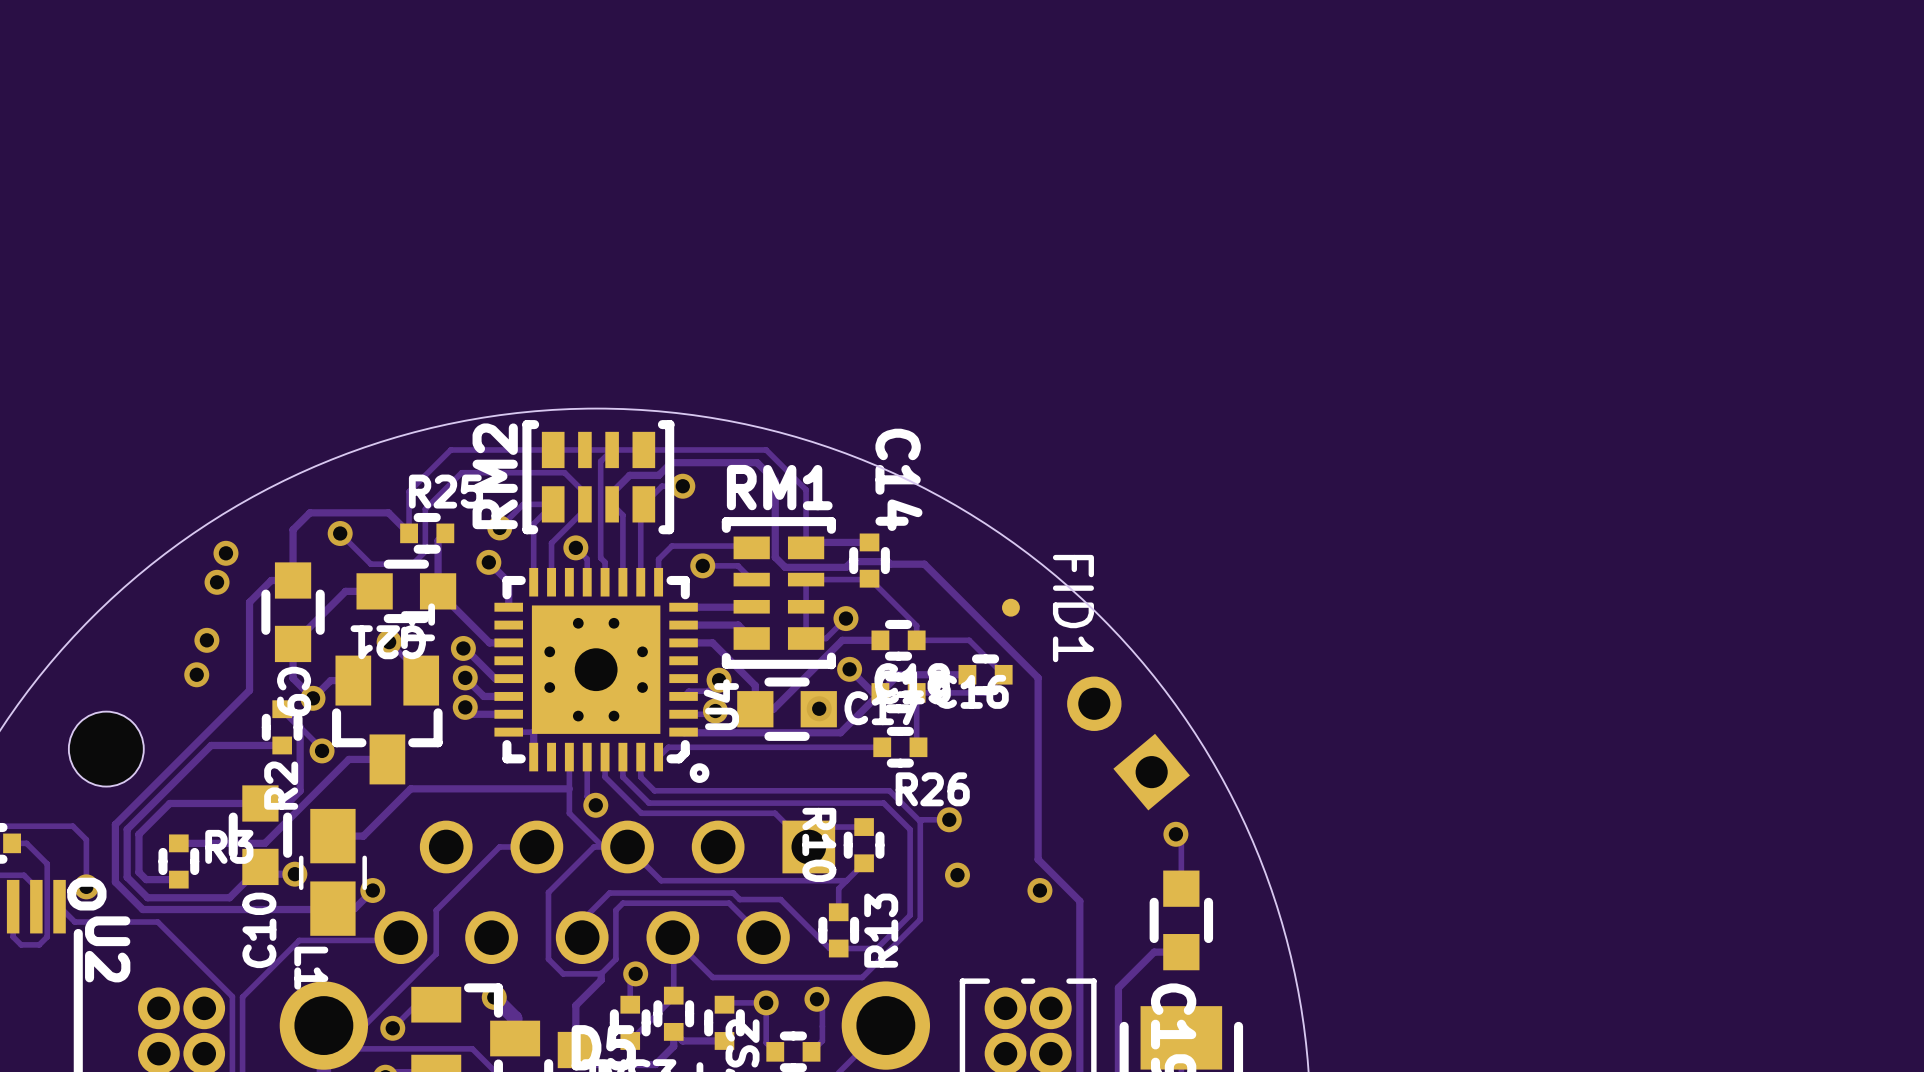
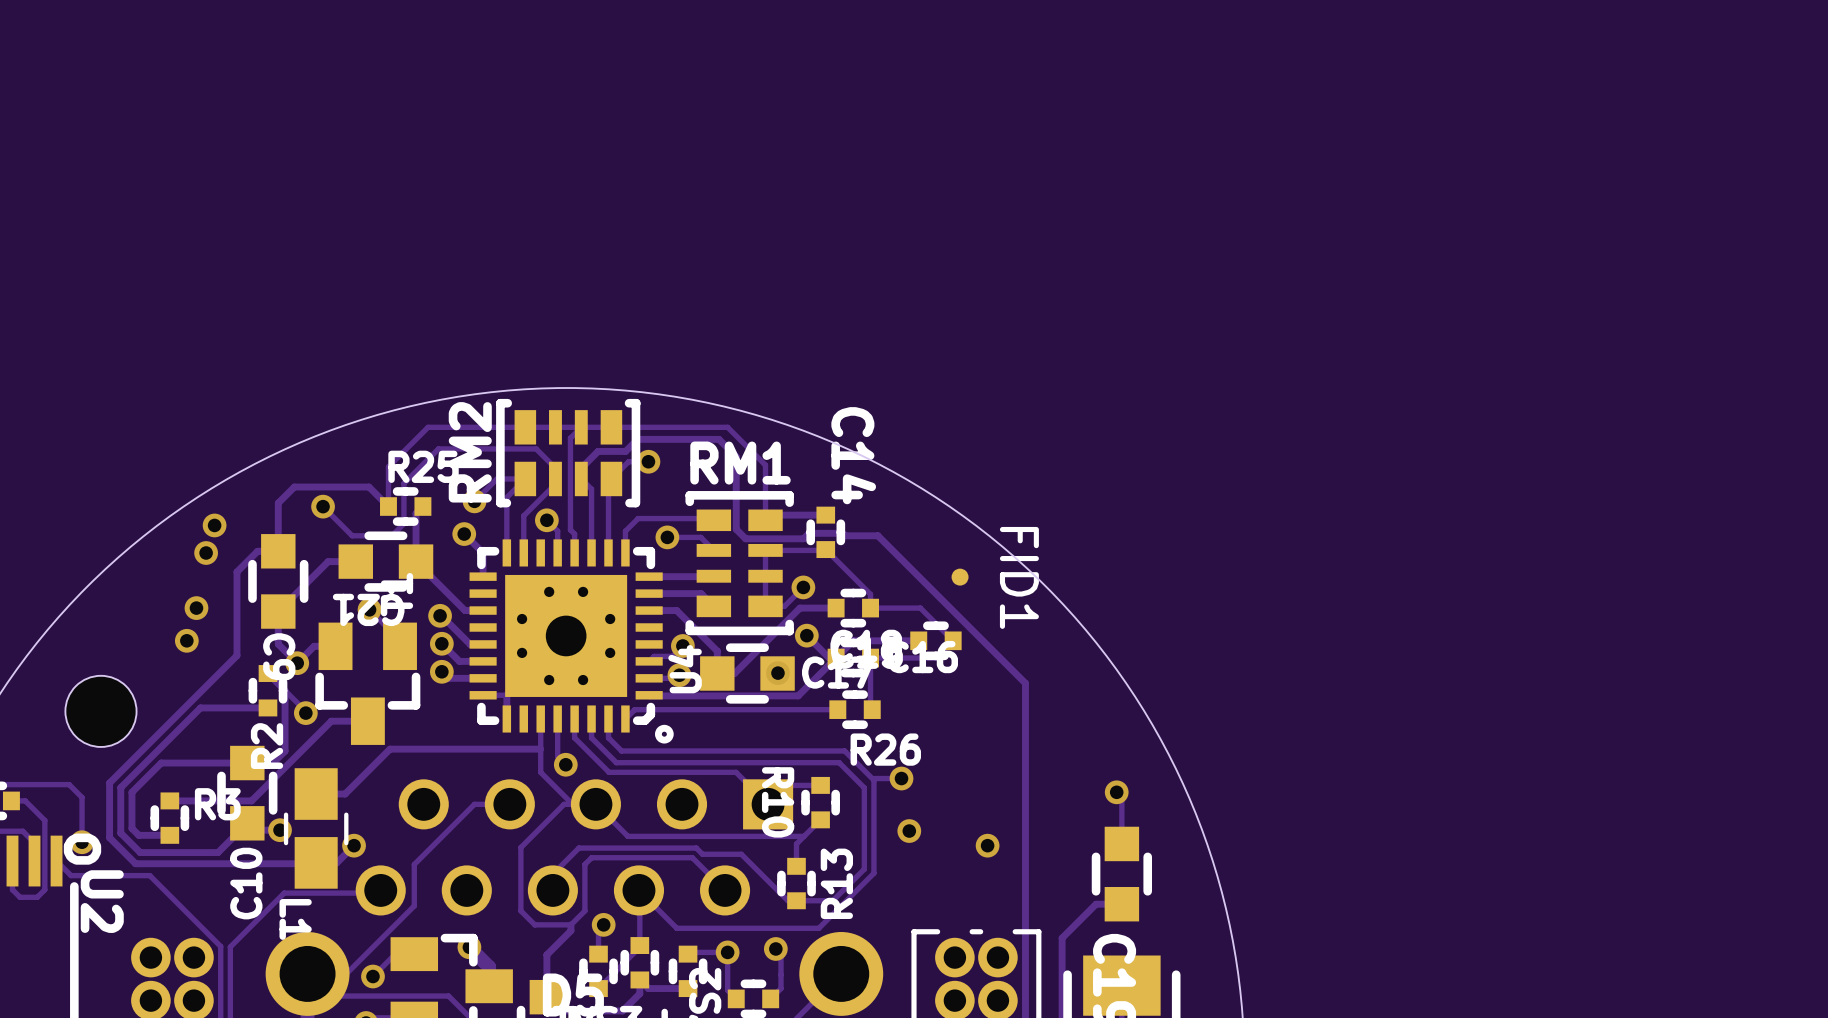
track: (1038, 677) (1038, 859) (1079, 901) -> (985, 643) (1025, 683) (1025, 855)
part: (1128, 743) -> none

